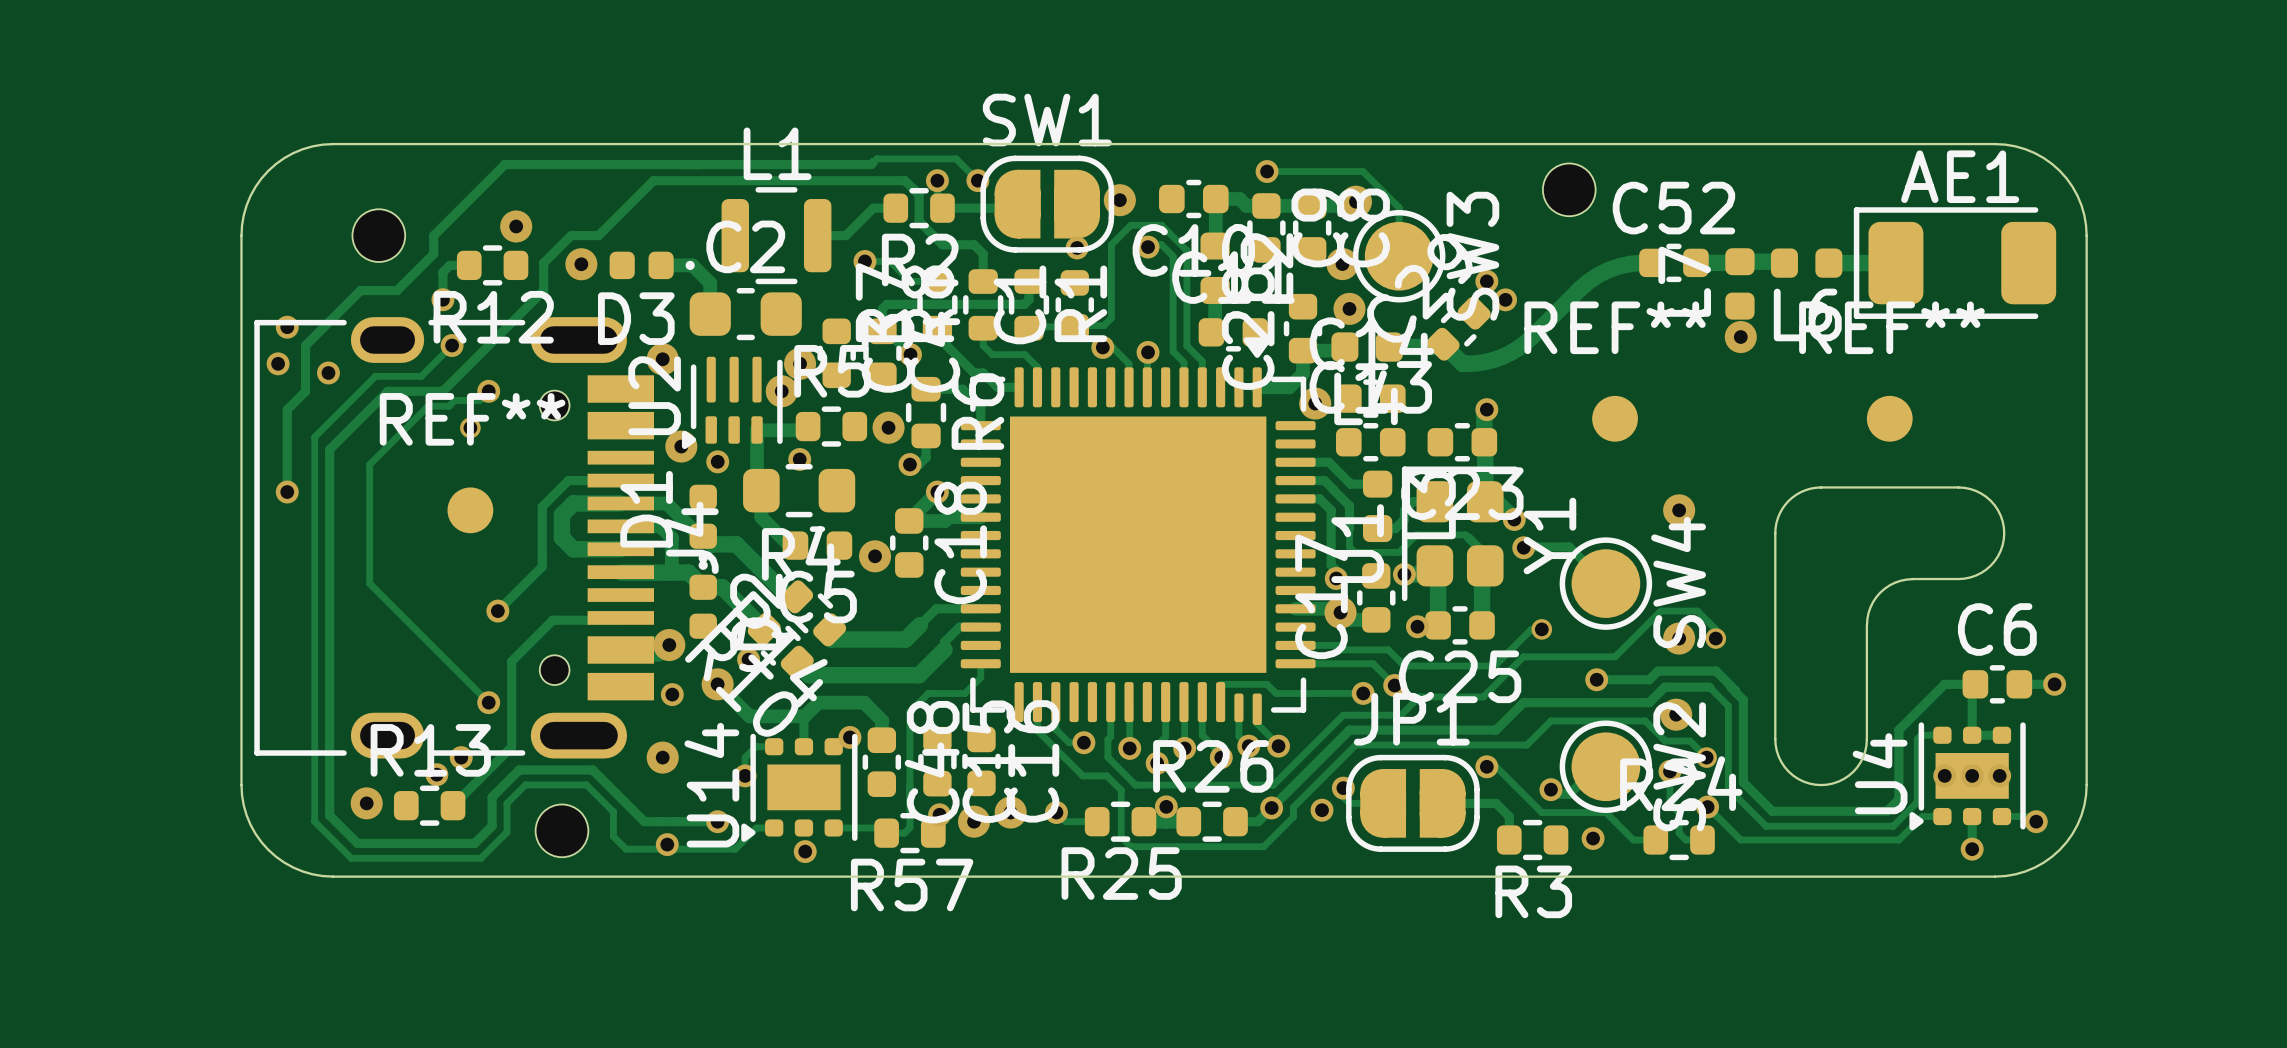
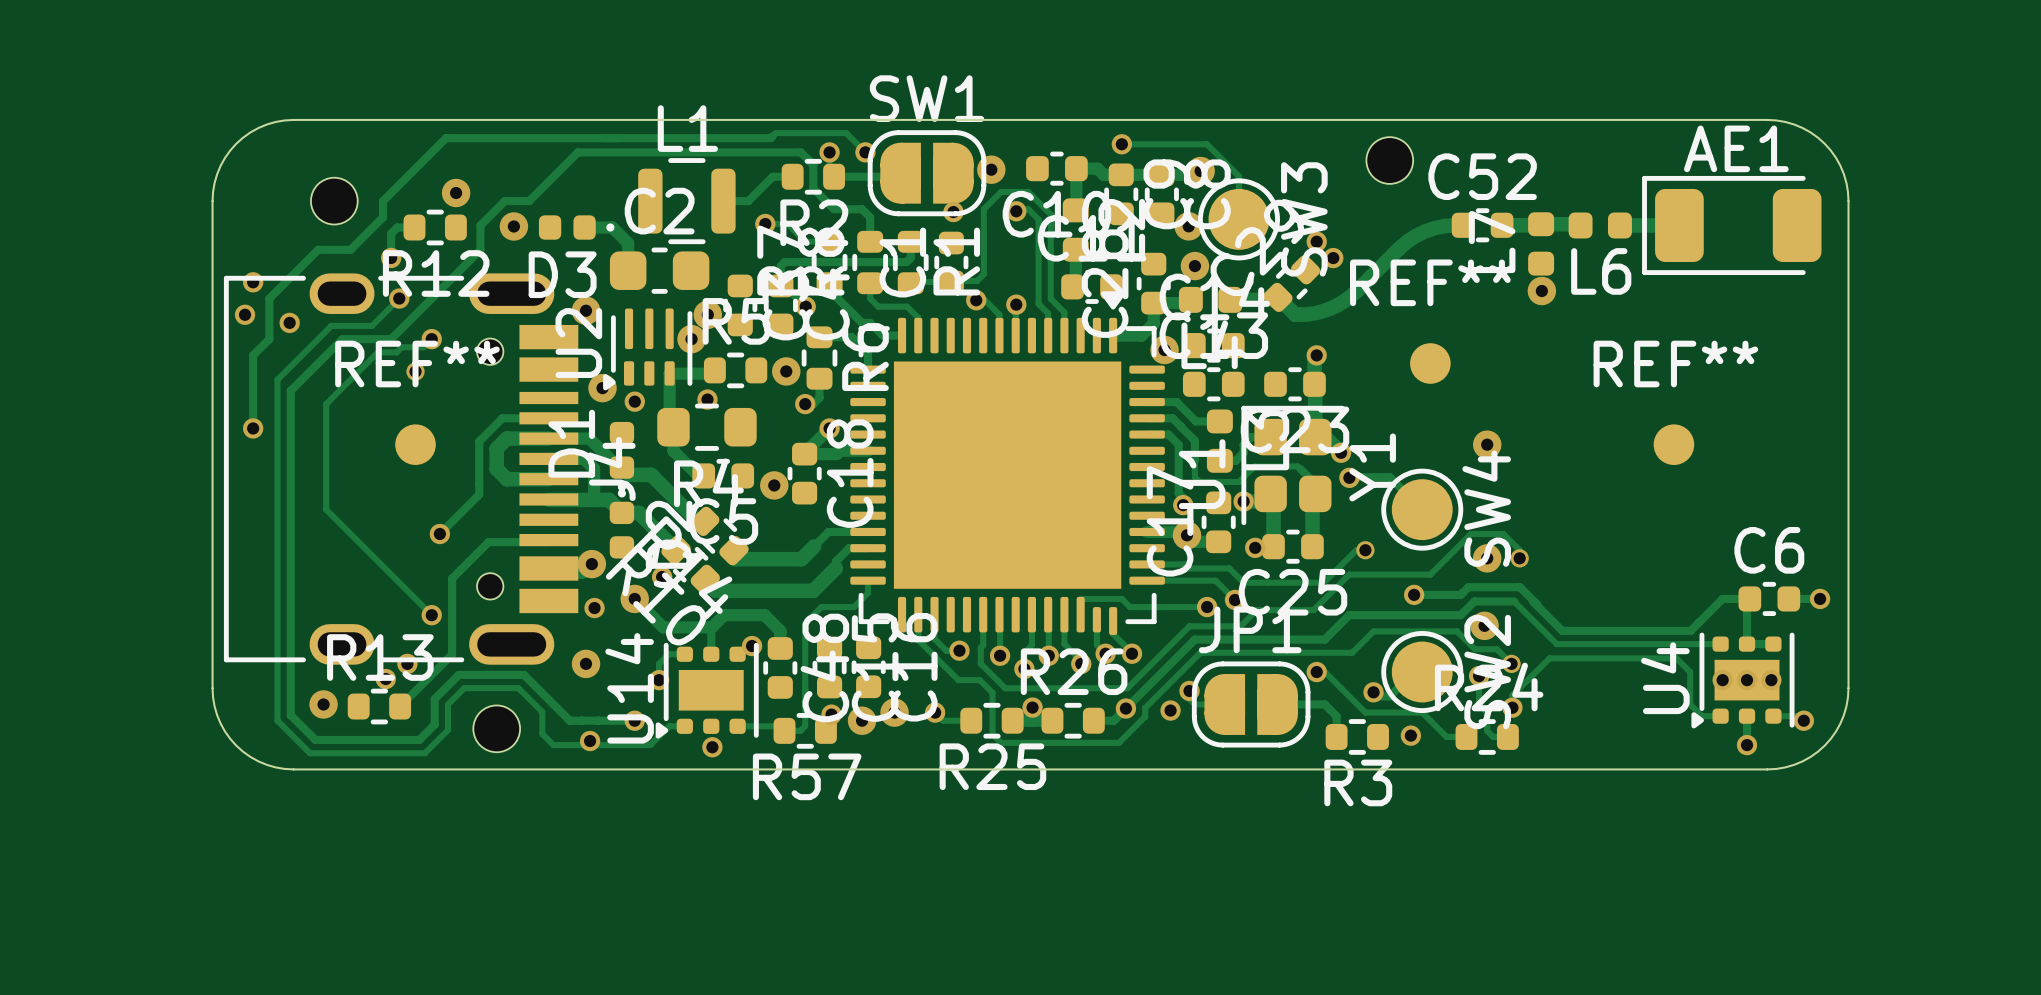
REF** position: (1889, 418) -> (1673, 444)
board edge: (1821, 487) (1970, 489) (1986, 496) (1994, 505) (2000, 515) (2004, 533) (2002, 545) (1998, 556) (1990, 565) (1981, 572) (1964, 578) (1900, 580) (1889, 585) (1876, 597) (1870, 607) (1867, 618) (1865, 751) (1857, 767) (1848, 775) (1838, 781) (1821, 785) (1803, 781) (1788, 771) (1778, 756) (1775, 739) (1776, 523) (1782, 508) (1792, 497) (1805, 490) (1821, 487) -> none
track: (1743, 699) (1743, 782) (1772, 811) (1887, 811) (1898, 799) (1898, 730) (1908, 720) -> (1544, 612) (1562, 630) (1690, 630)
track: (1728, 706) (1728, 788) (1766, 826) (1893, 826) (1916, 802) -> (1530, 618) (1556, 644) (1701, 644)
track: (1921, 735) (1917, 739) (1917, 802) -> none
track: (1707, 807) (1740, 840) (1898, 840) (1922, 816) -> (1512, 707) (1512, 695) (1549, 658) (1676, 658) (1690, 672) (1690, 704) (1702, 716)

